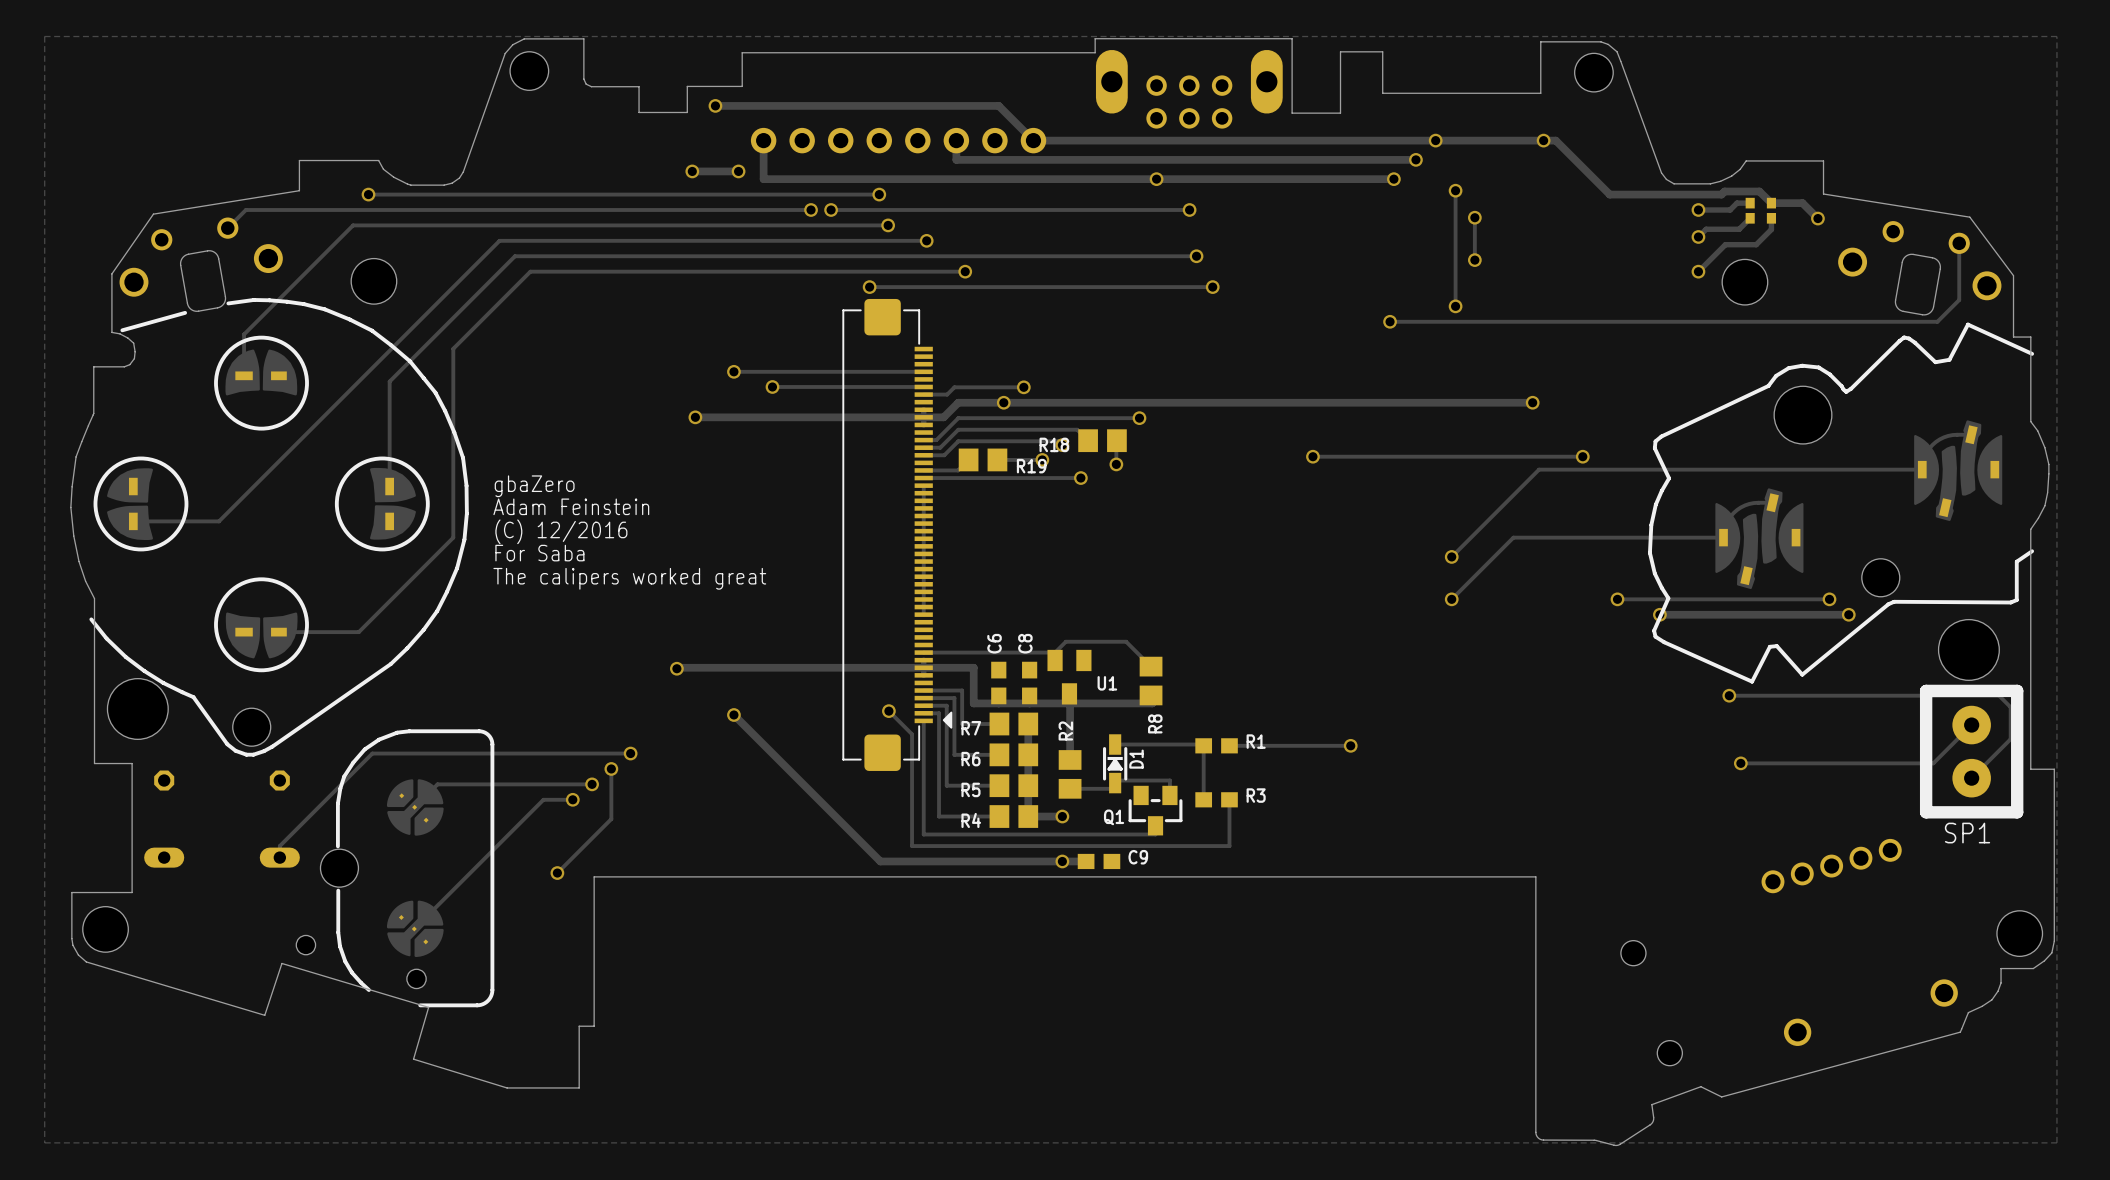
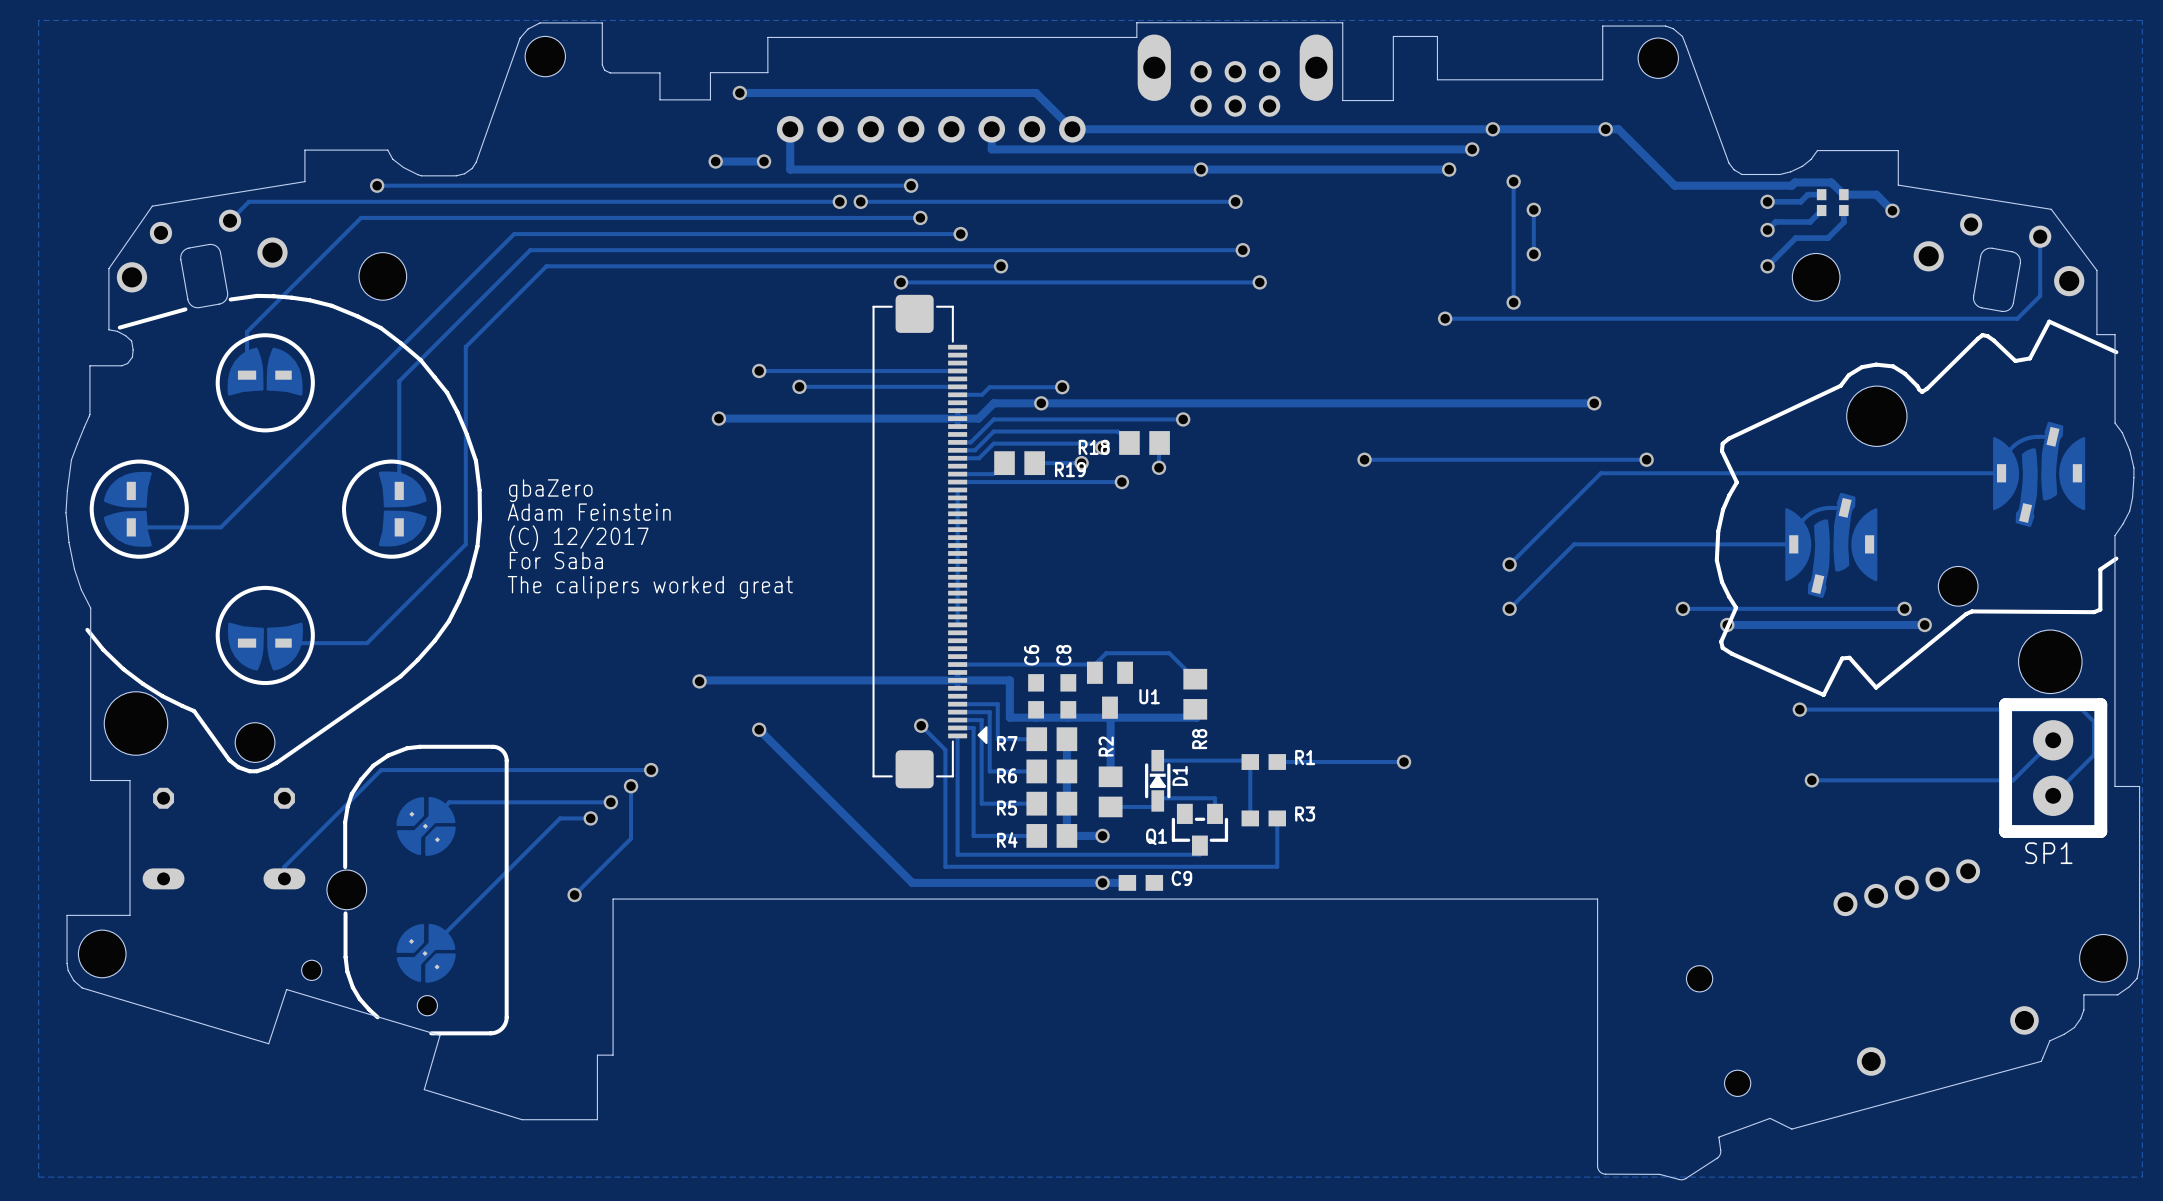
text: (C) 12/2016 (561, 531) -> (C) 12/2017 (579, 538)

